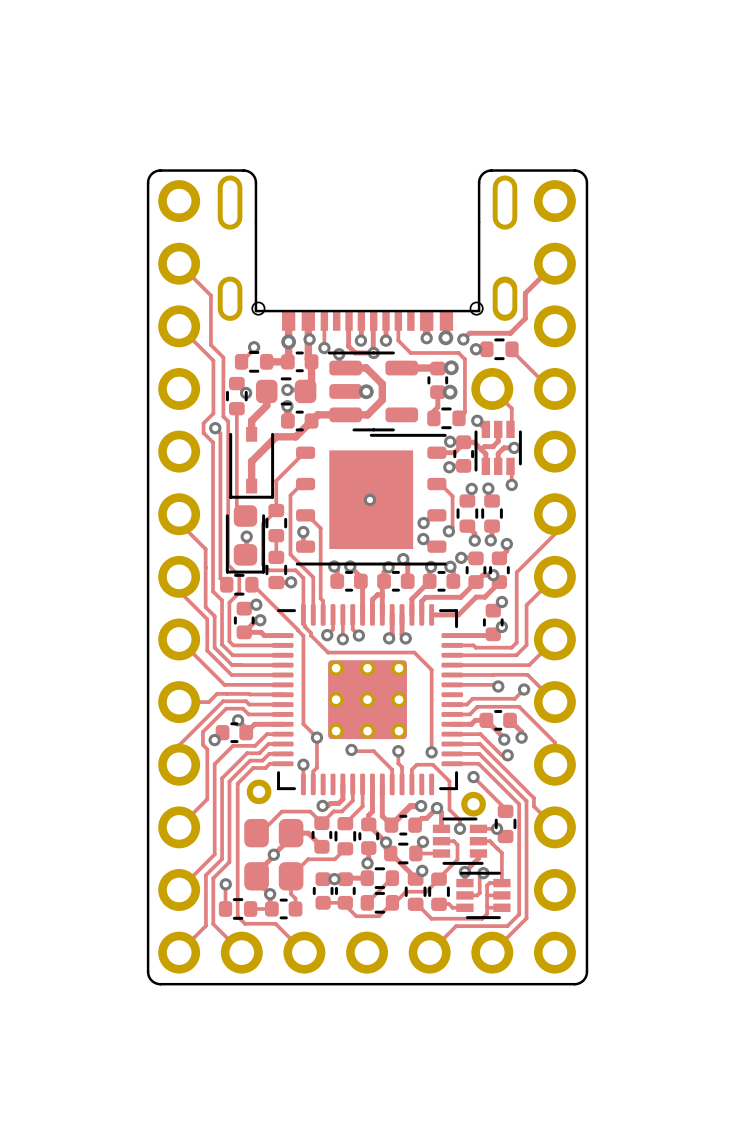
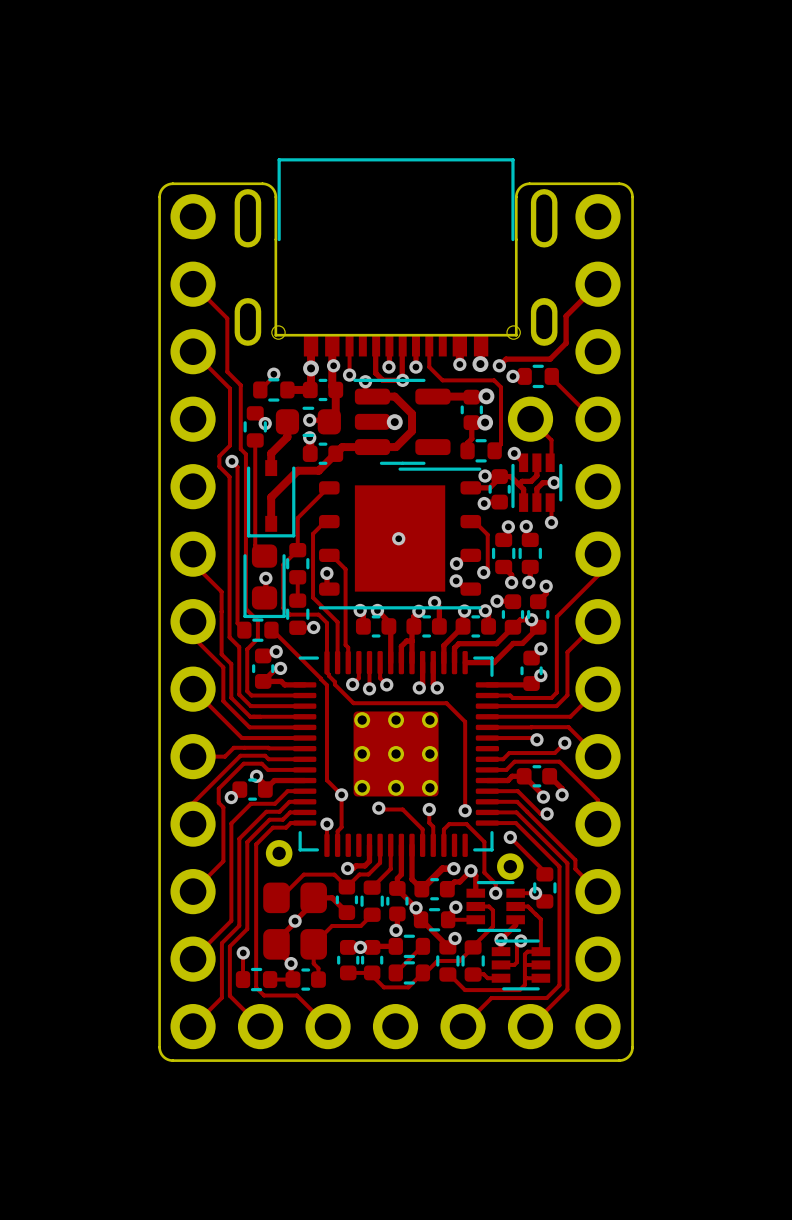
part footprint: [217, 175, 518, 331] -> [234, 158, 558, 357]

